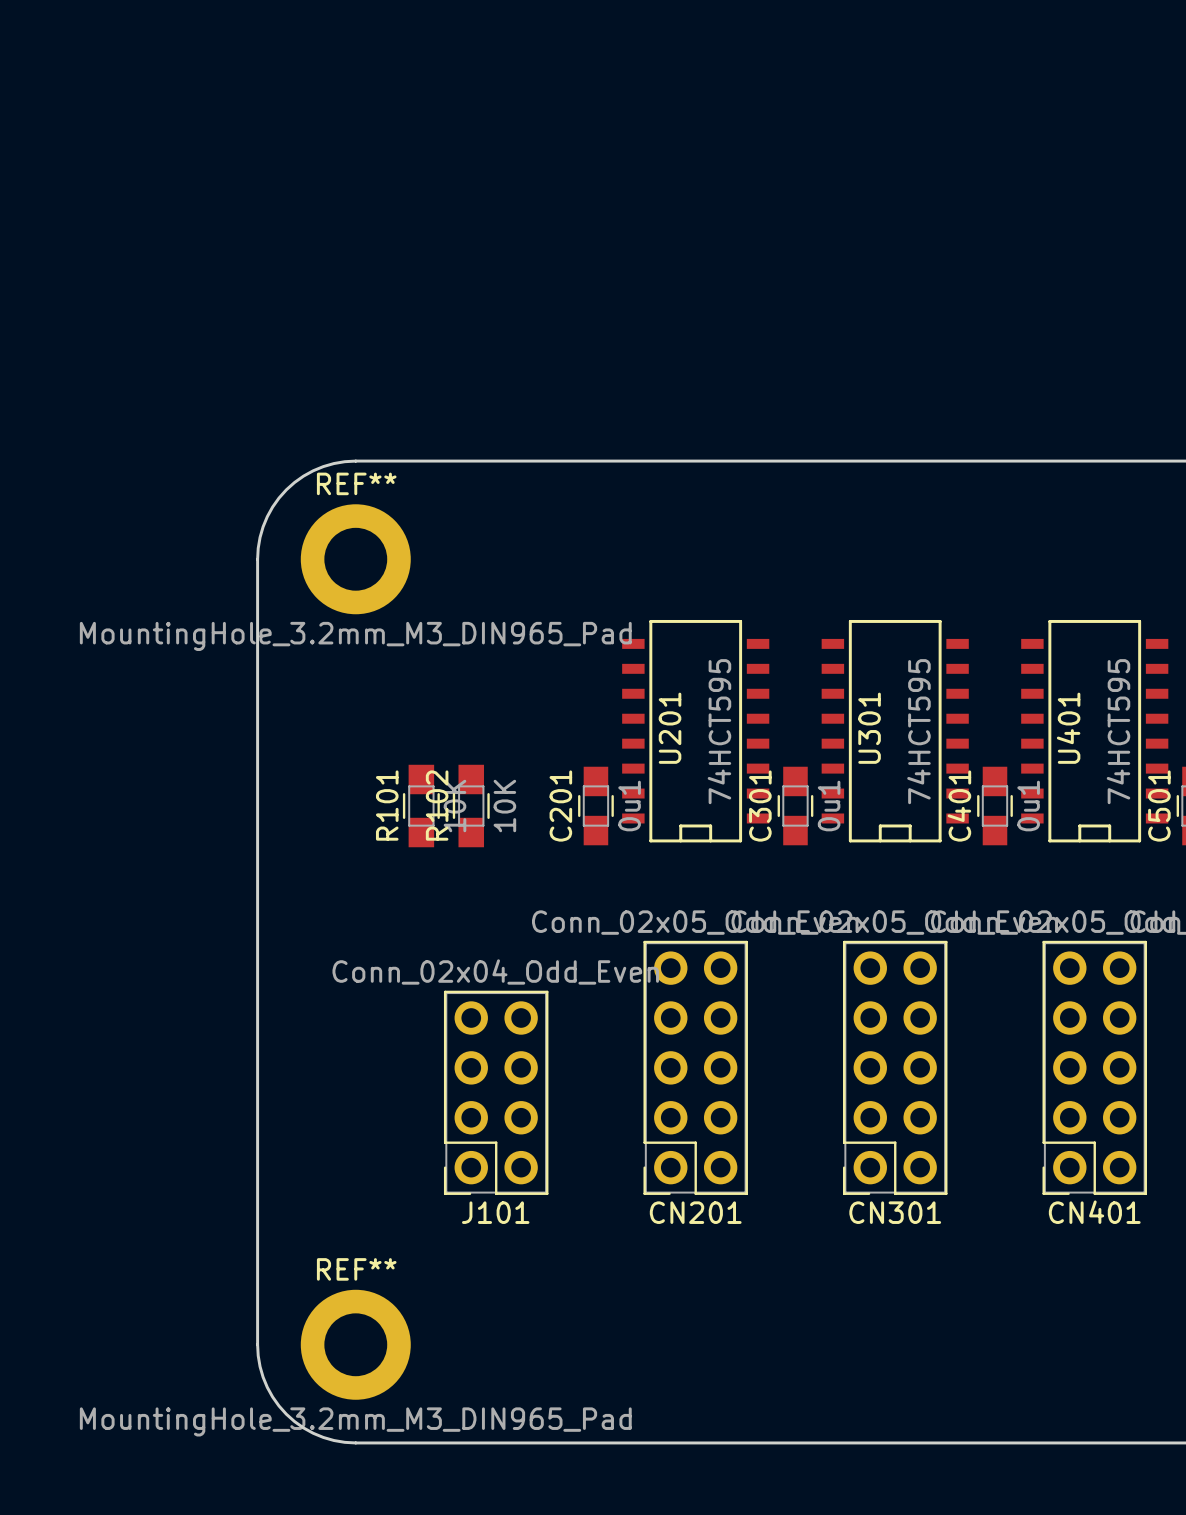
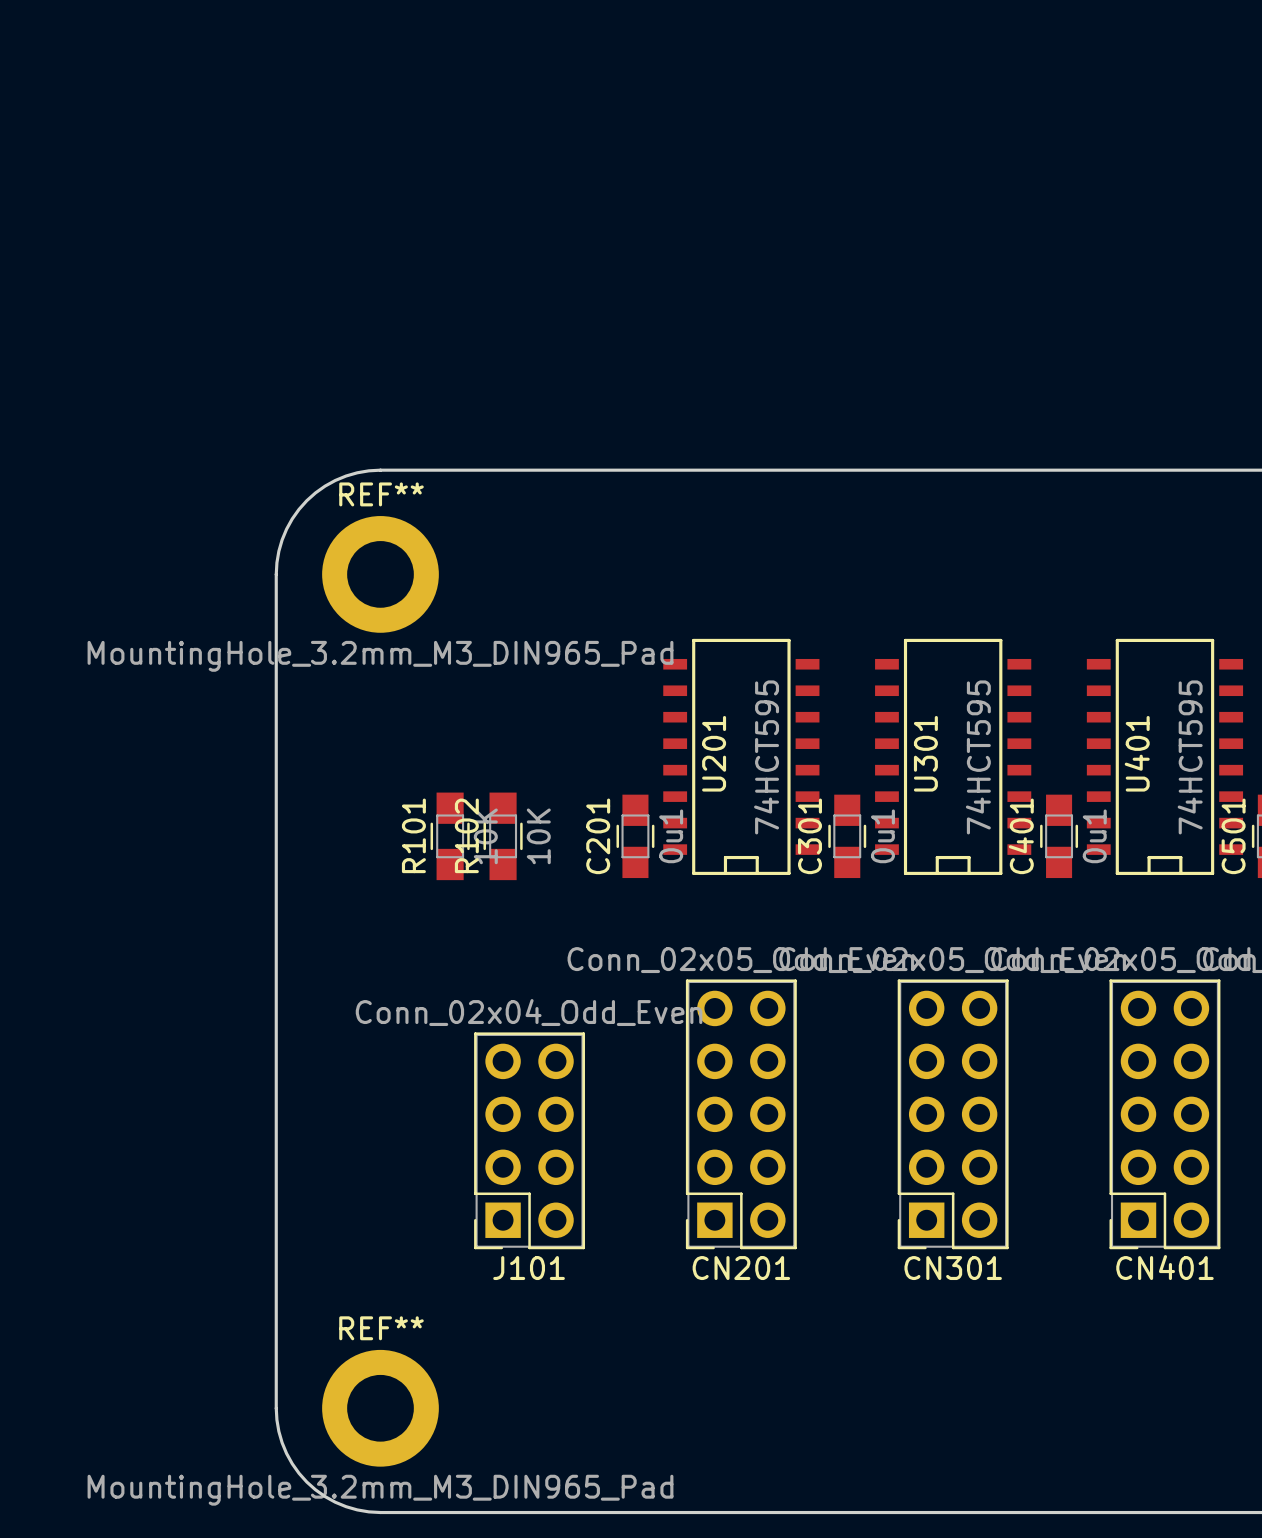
CN201 footprint: [643, 940, 748, 1195] -> [685, 979, 797, 1250]
CN301 footprint: [842, 940, 948, 1195] -> [897, 979, 1009, 1250]
CN401 footprint: [1042, 940, 1147, 1195] -> [1109, 979, 1221, 1250]
J101 footprint: [443, 990, 549, 1195] -> [474, 1032, 586, 1250]

